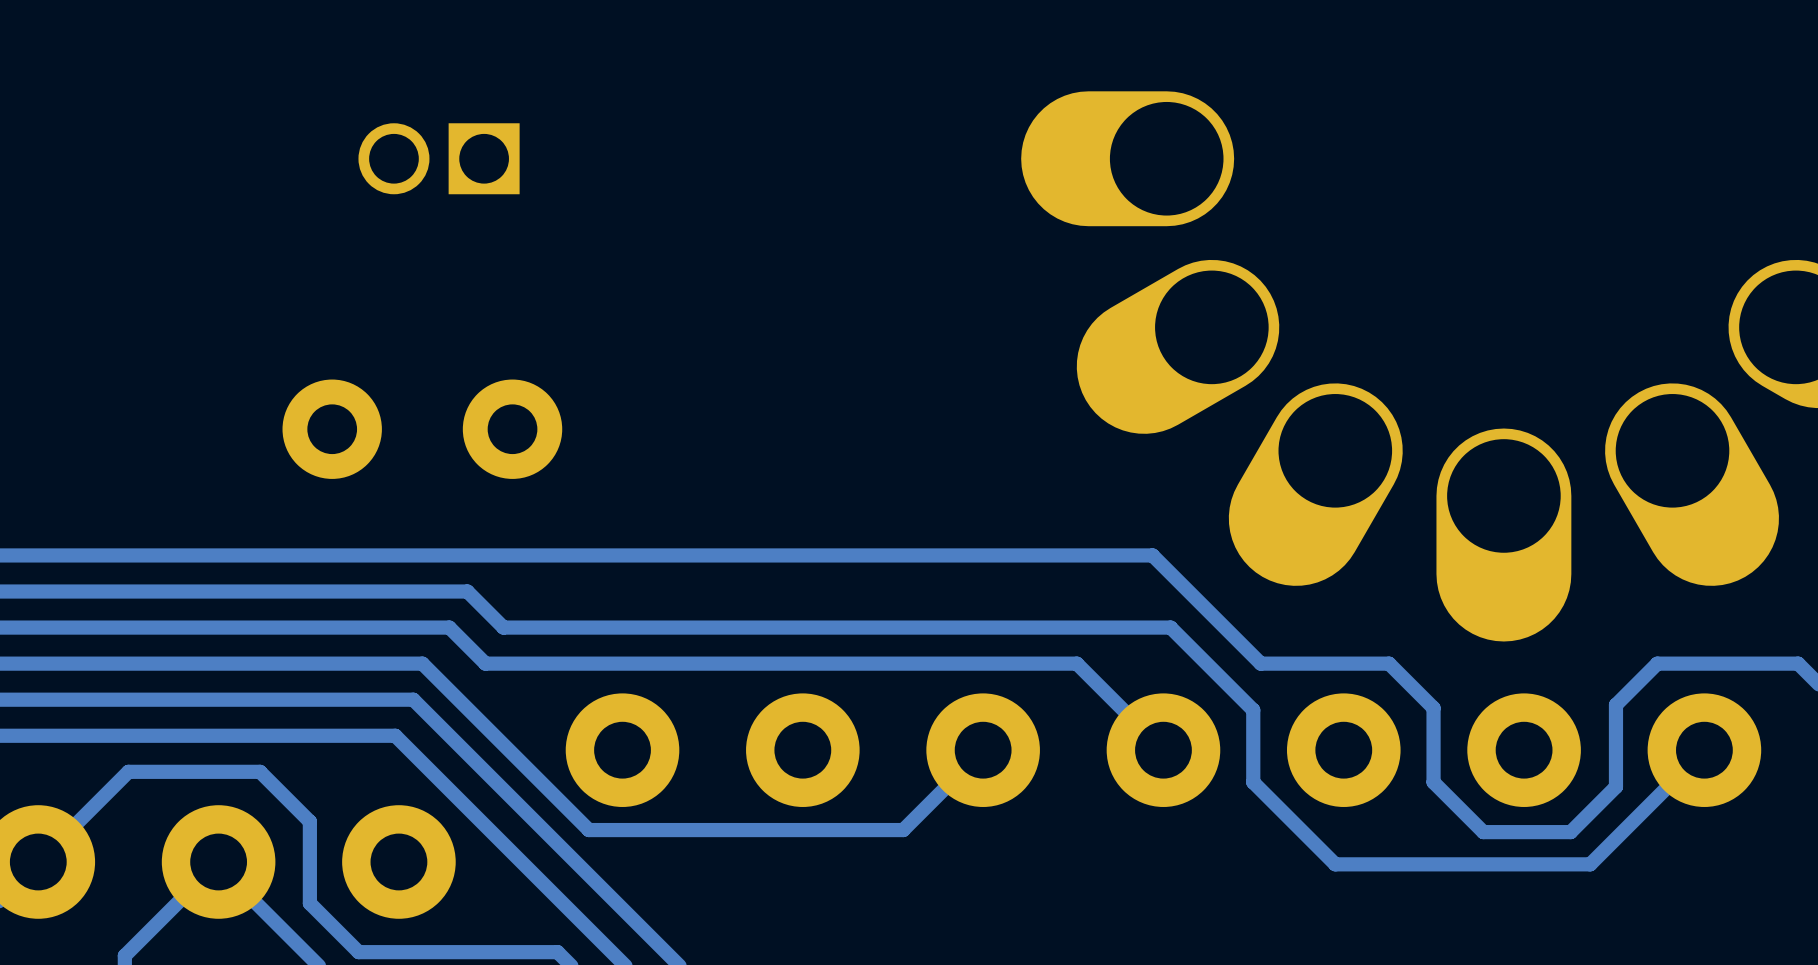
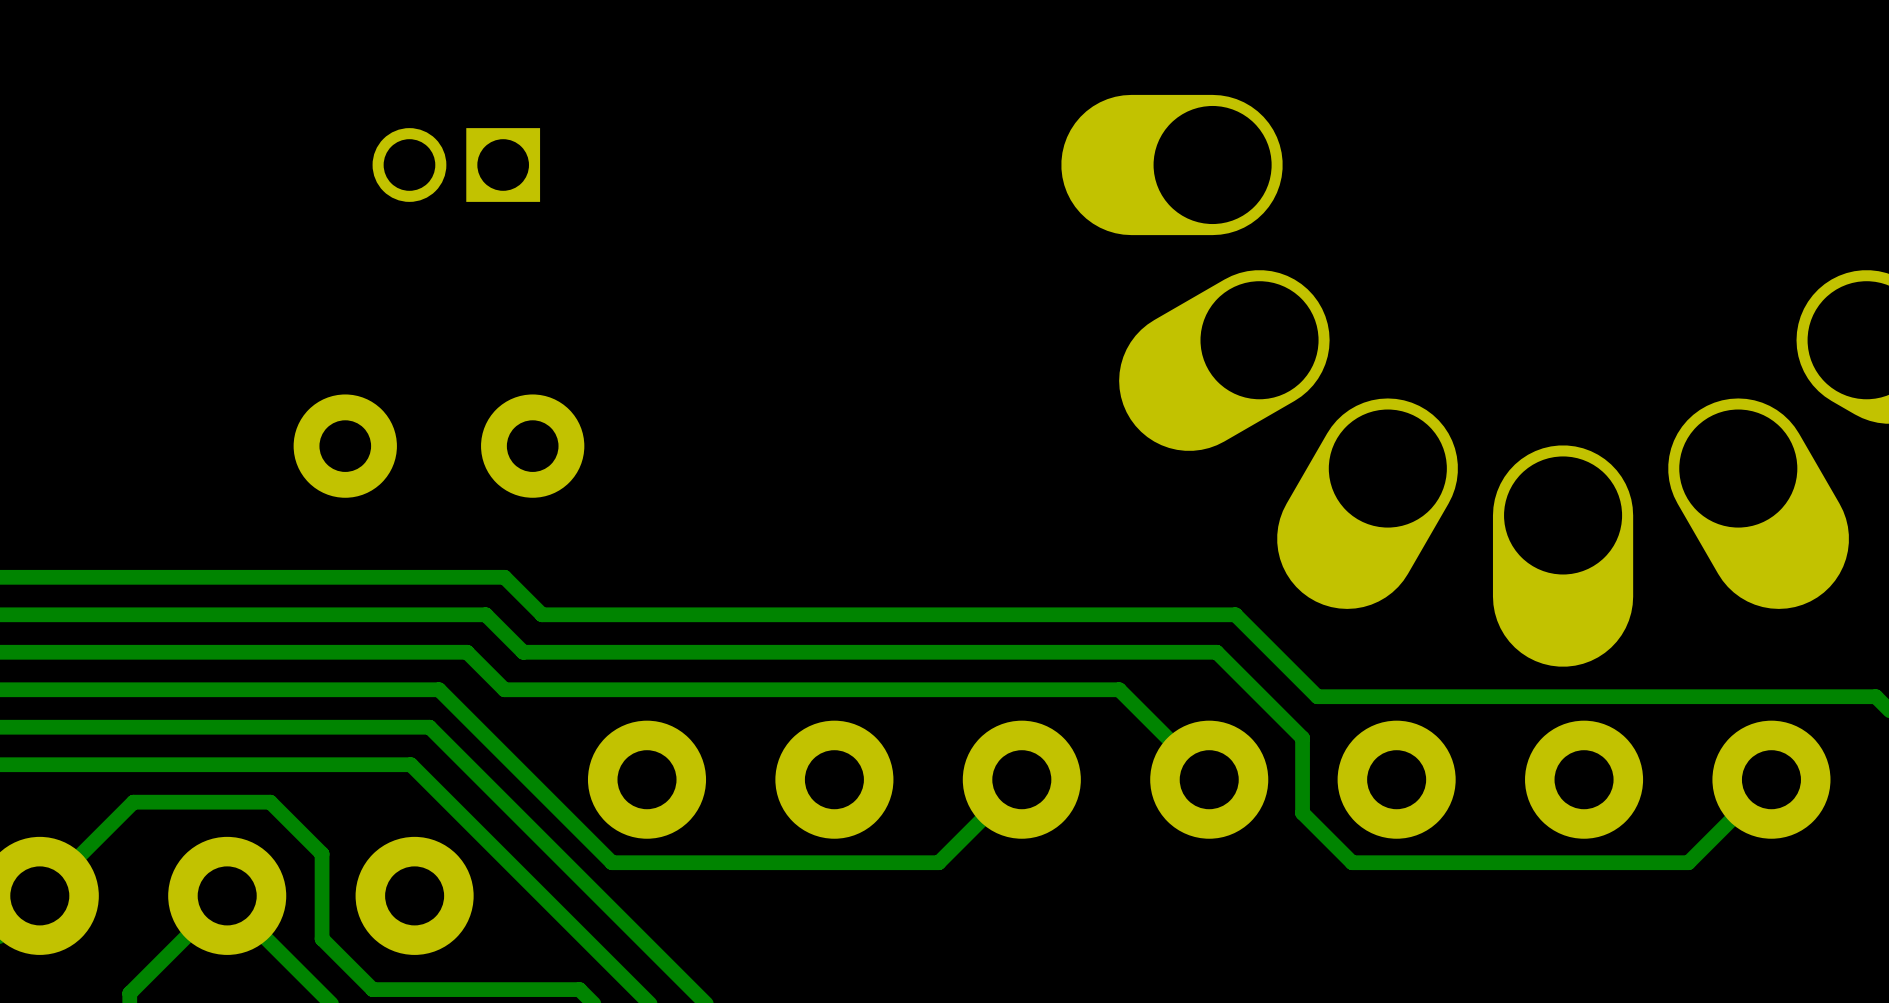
bottom track: (485, 555) (1152, 555) (1188, 591) -> (504, 577) (542, 614) (1235, 614)
bottom track: (1260, 663) (1389, 663) (1433, 708) (1433, 782) (1483, 832) (1570, 832) (1615, 786) (1615, 704) (1657, 663) (1798, 663) (1804, 670) -> (1310, 689) (1317, 696) (1875, 696)
bottom track: (1624, 830) (1590, 864) (1335, 864) (1301, 830) -> (1688, 862) (1352, 862)

